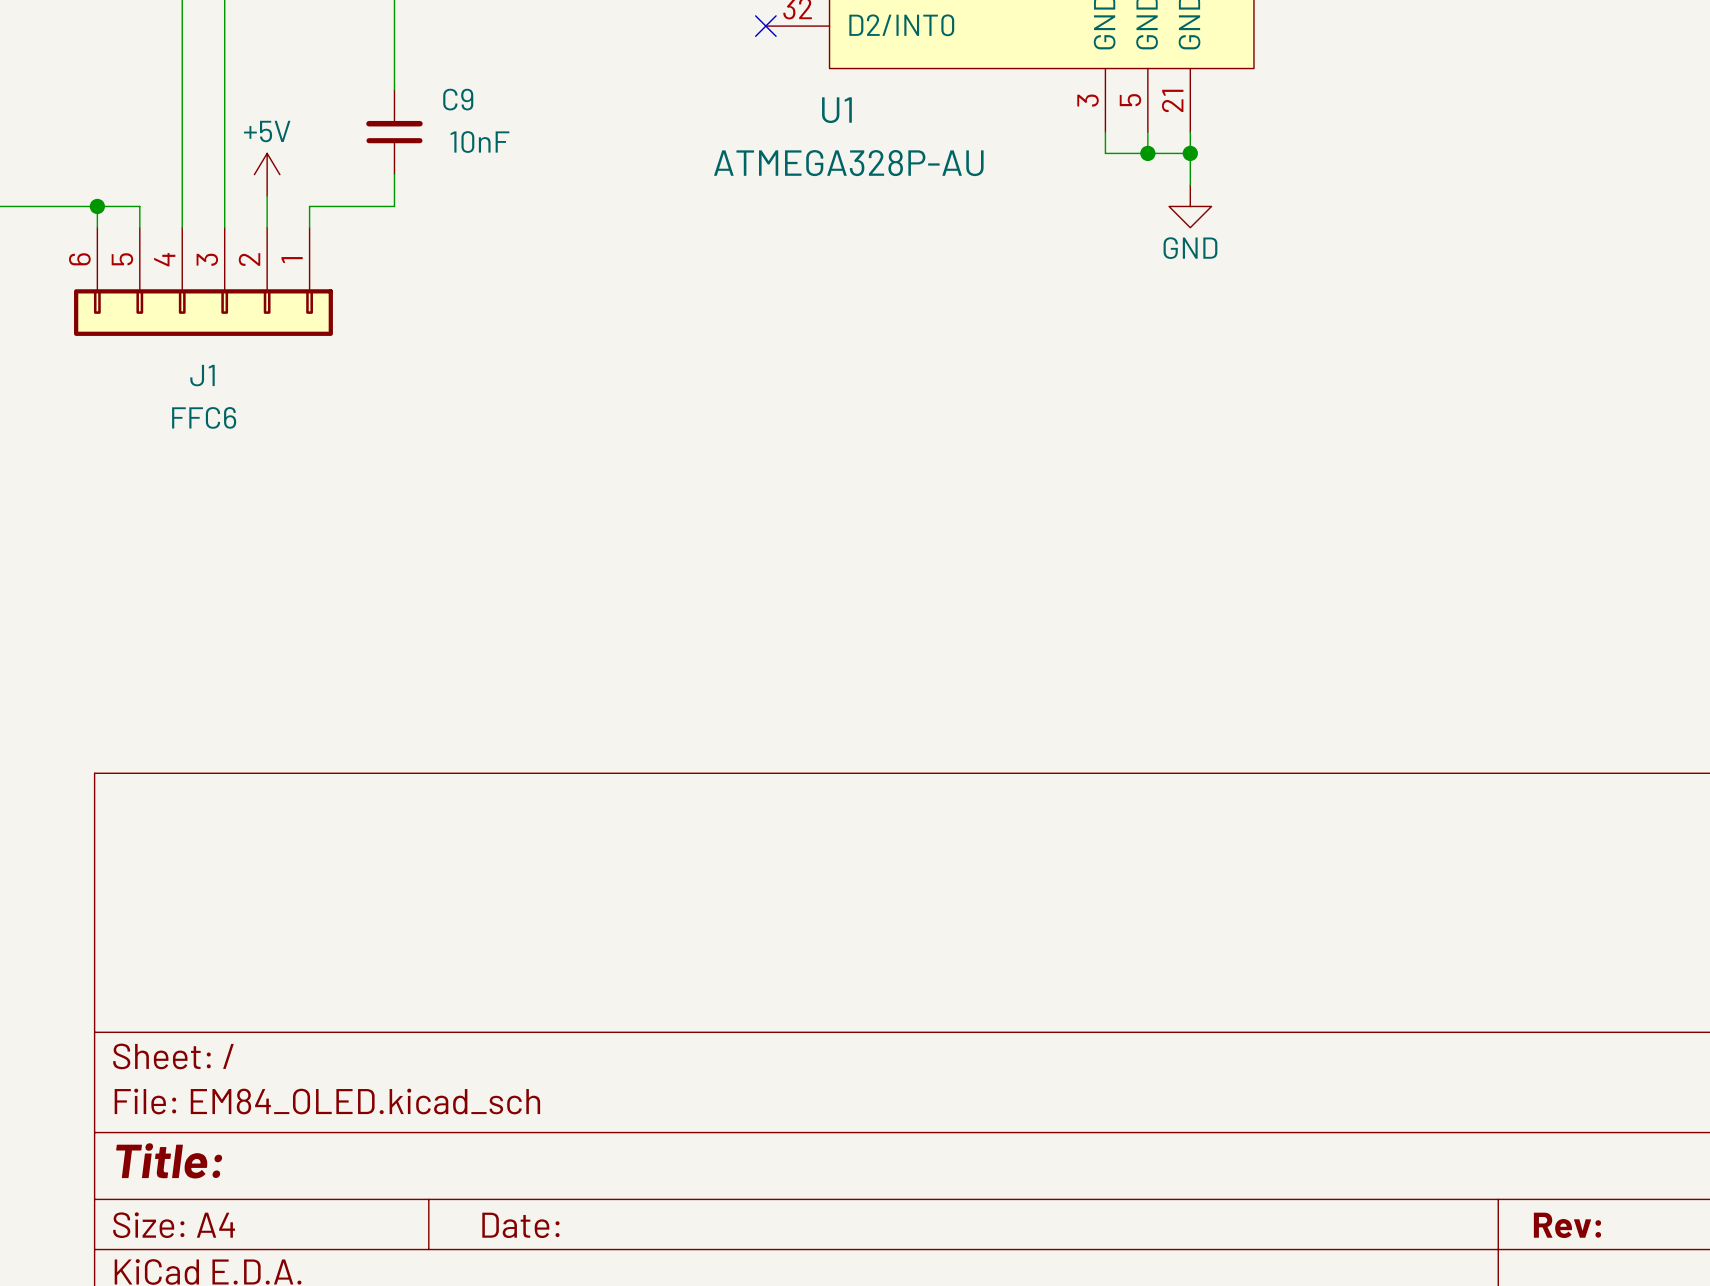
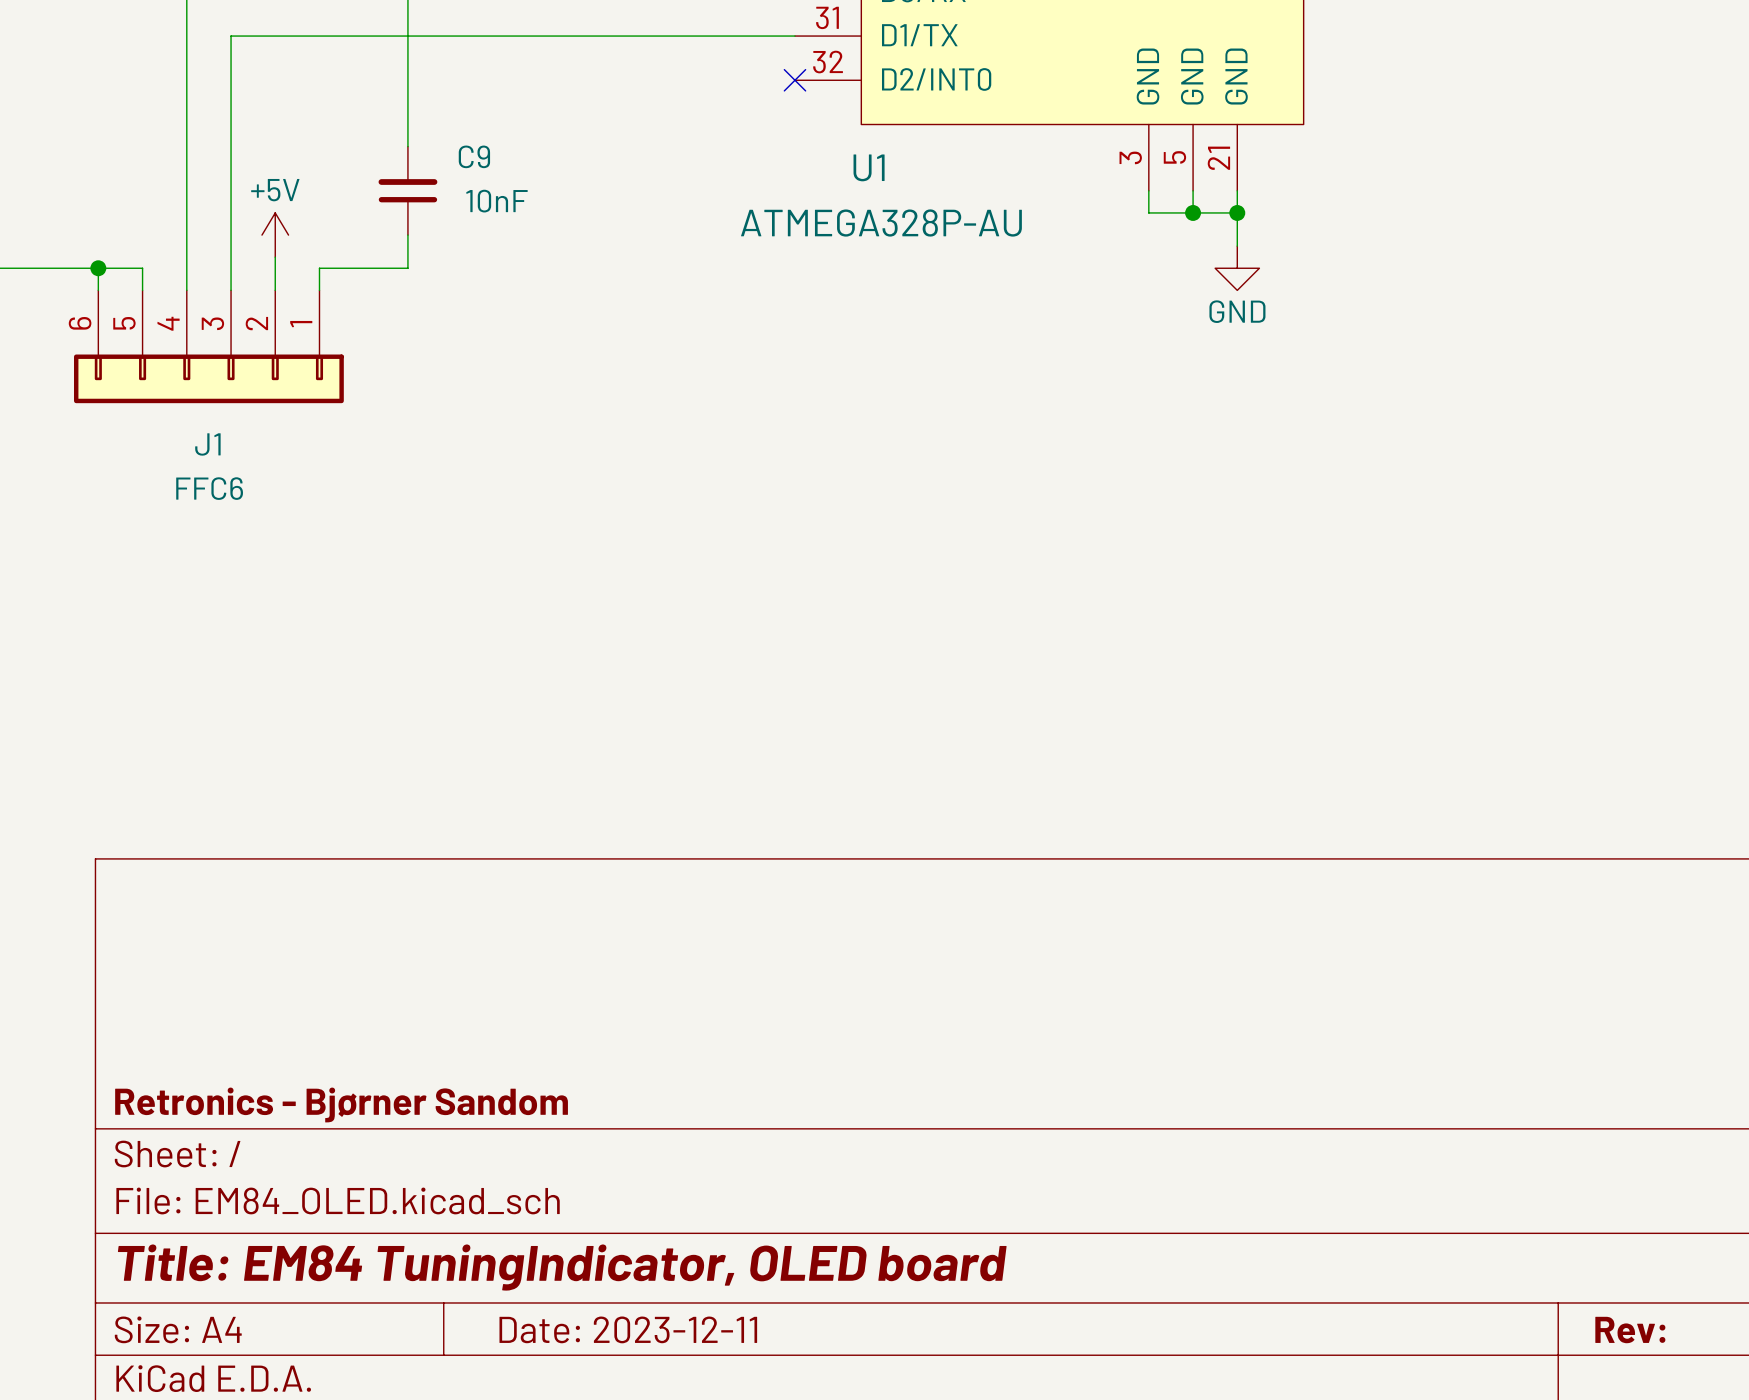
title block: none -> Retronics - Bjørner Sandom (341, 1105)
title block: Title: (169, 1160) -> Title: EM84 TuningIndicator, OLED board (562, 1267)
title block: Date: (520, 1225) -> Date: 2023-12-11 (628, 1329)

